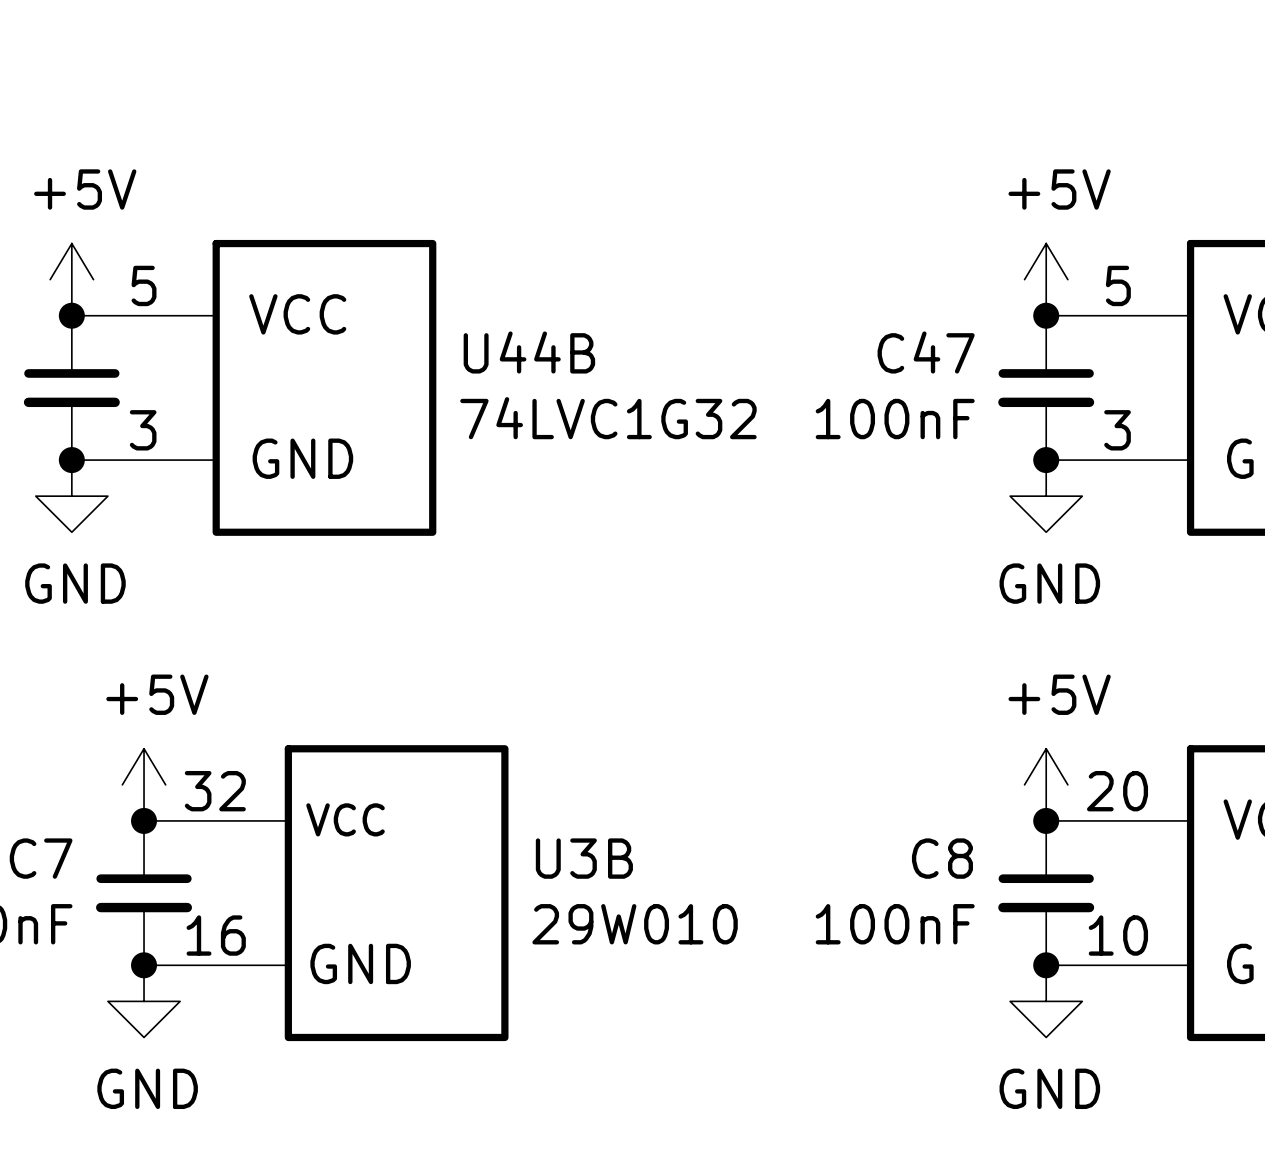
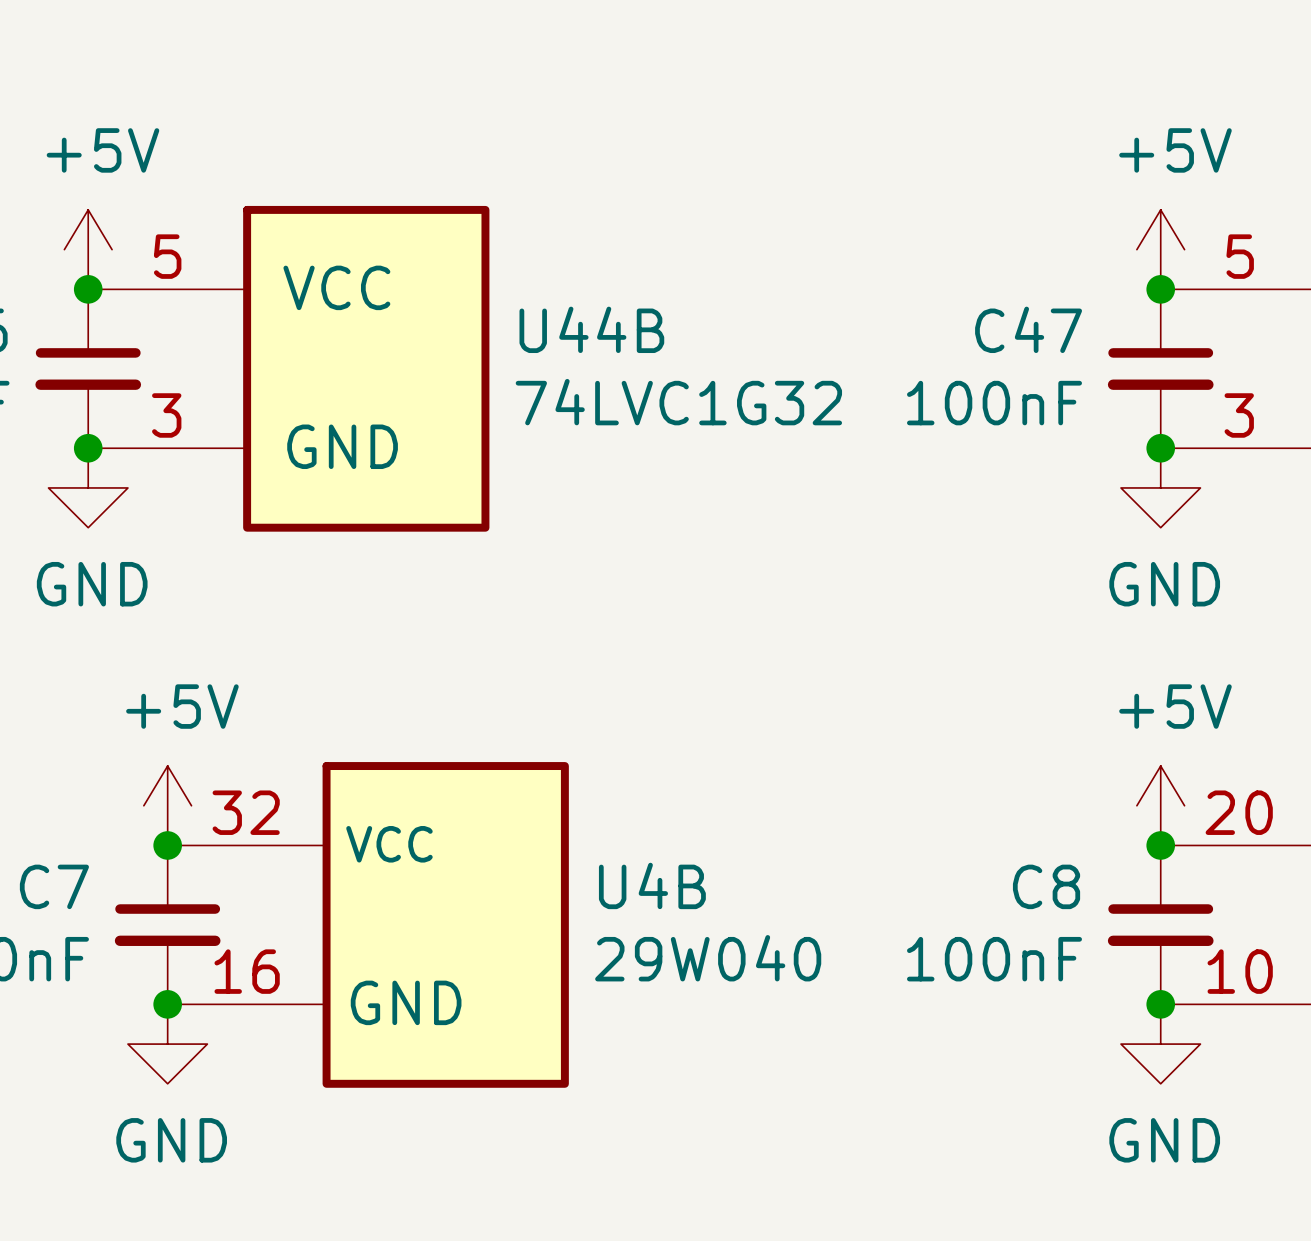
U3B name: U3B (584, 858) -> U4B (652, 885)
U3B value: 29W010 (635, 924) -> 29W040 (708, 958)

